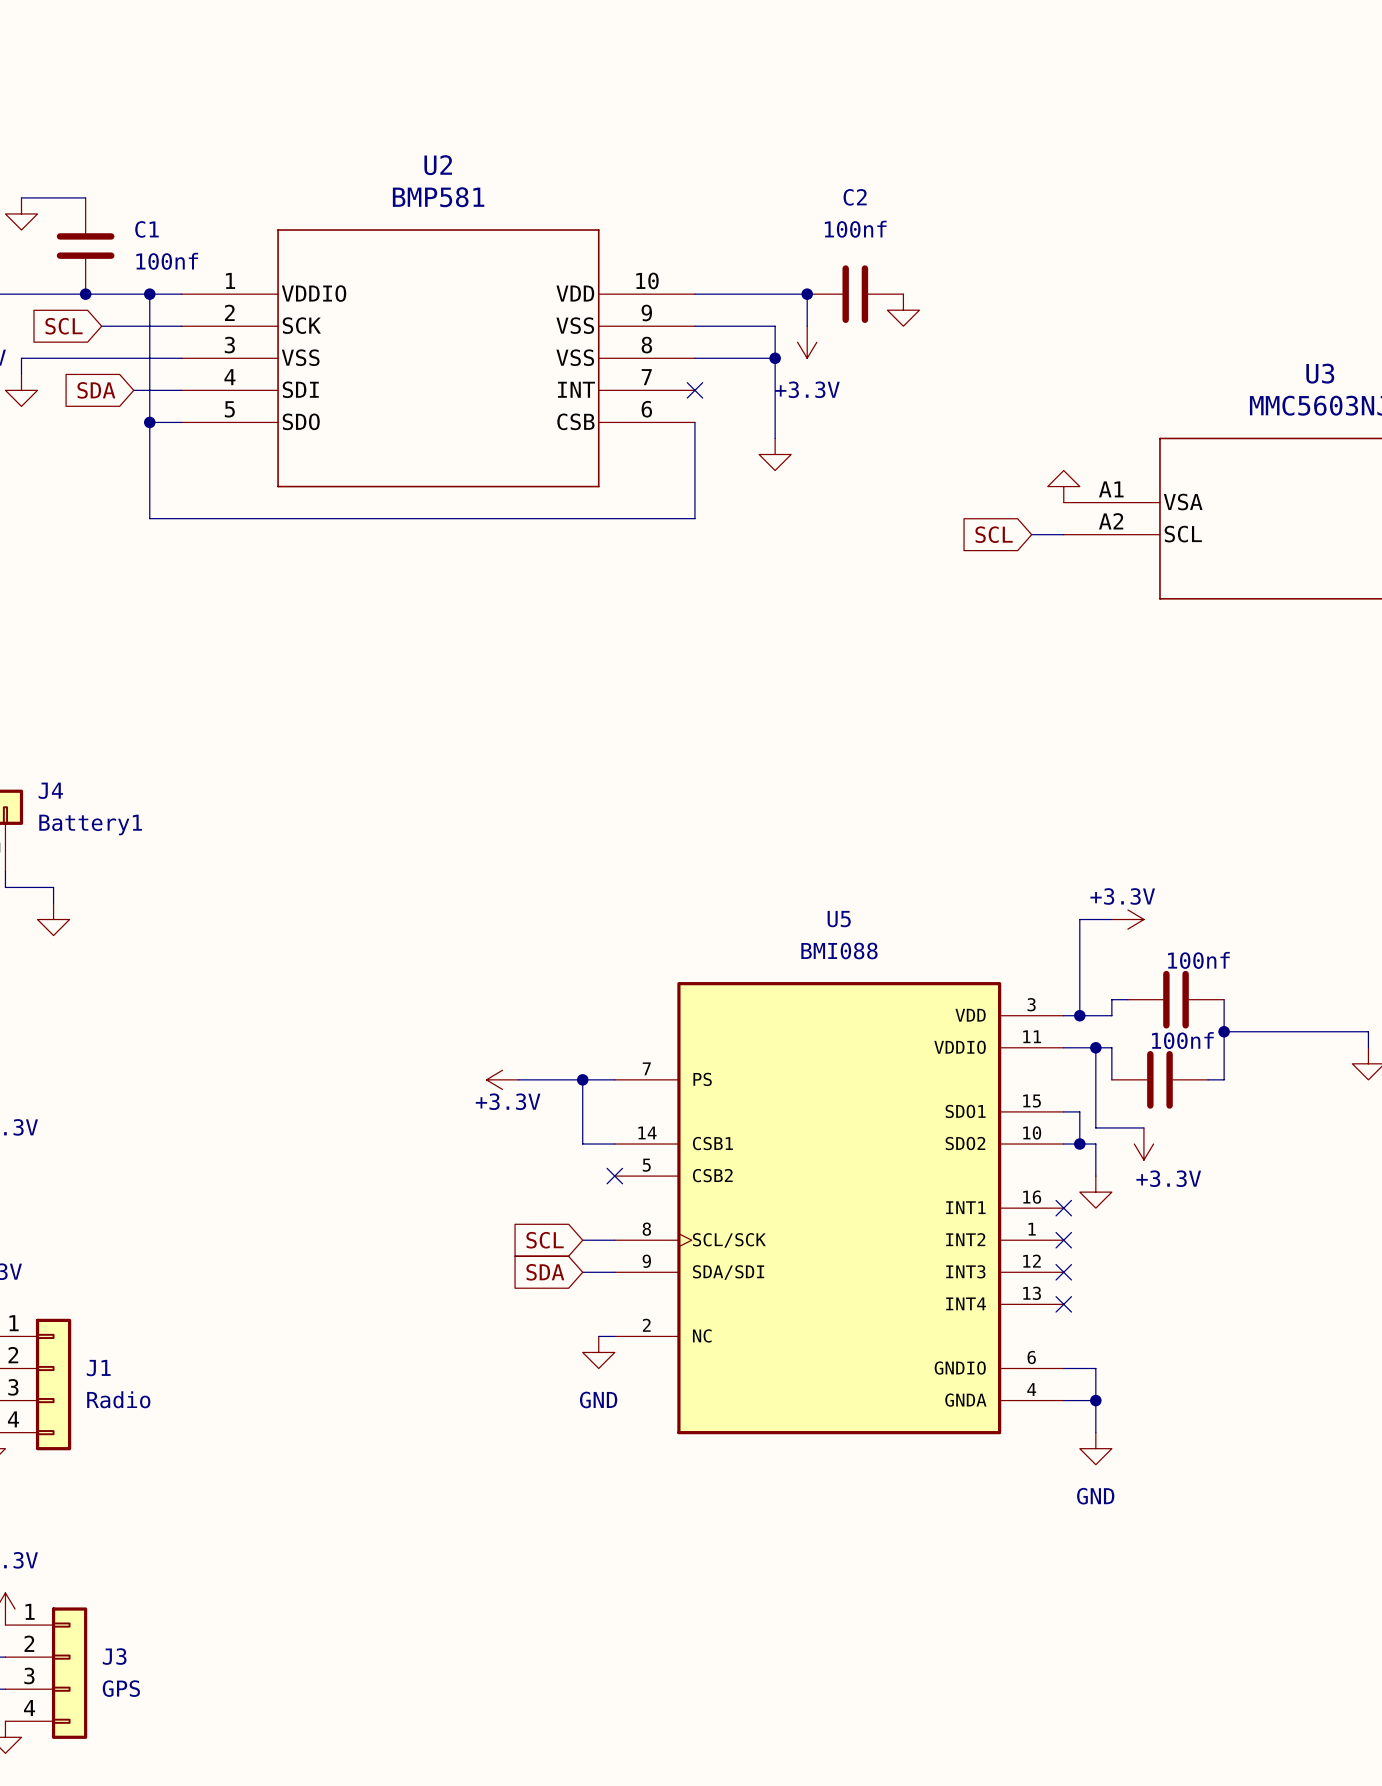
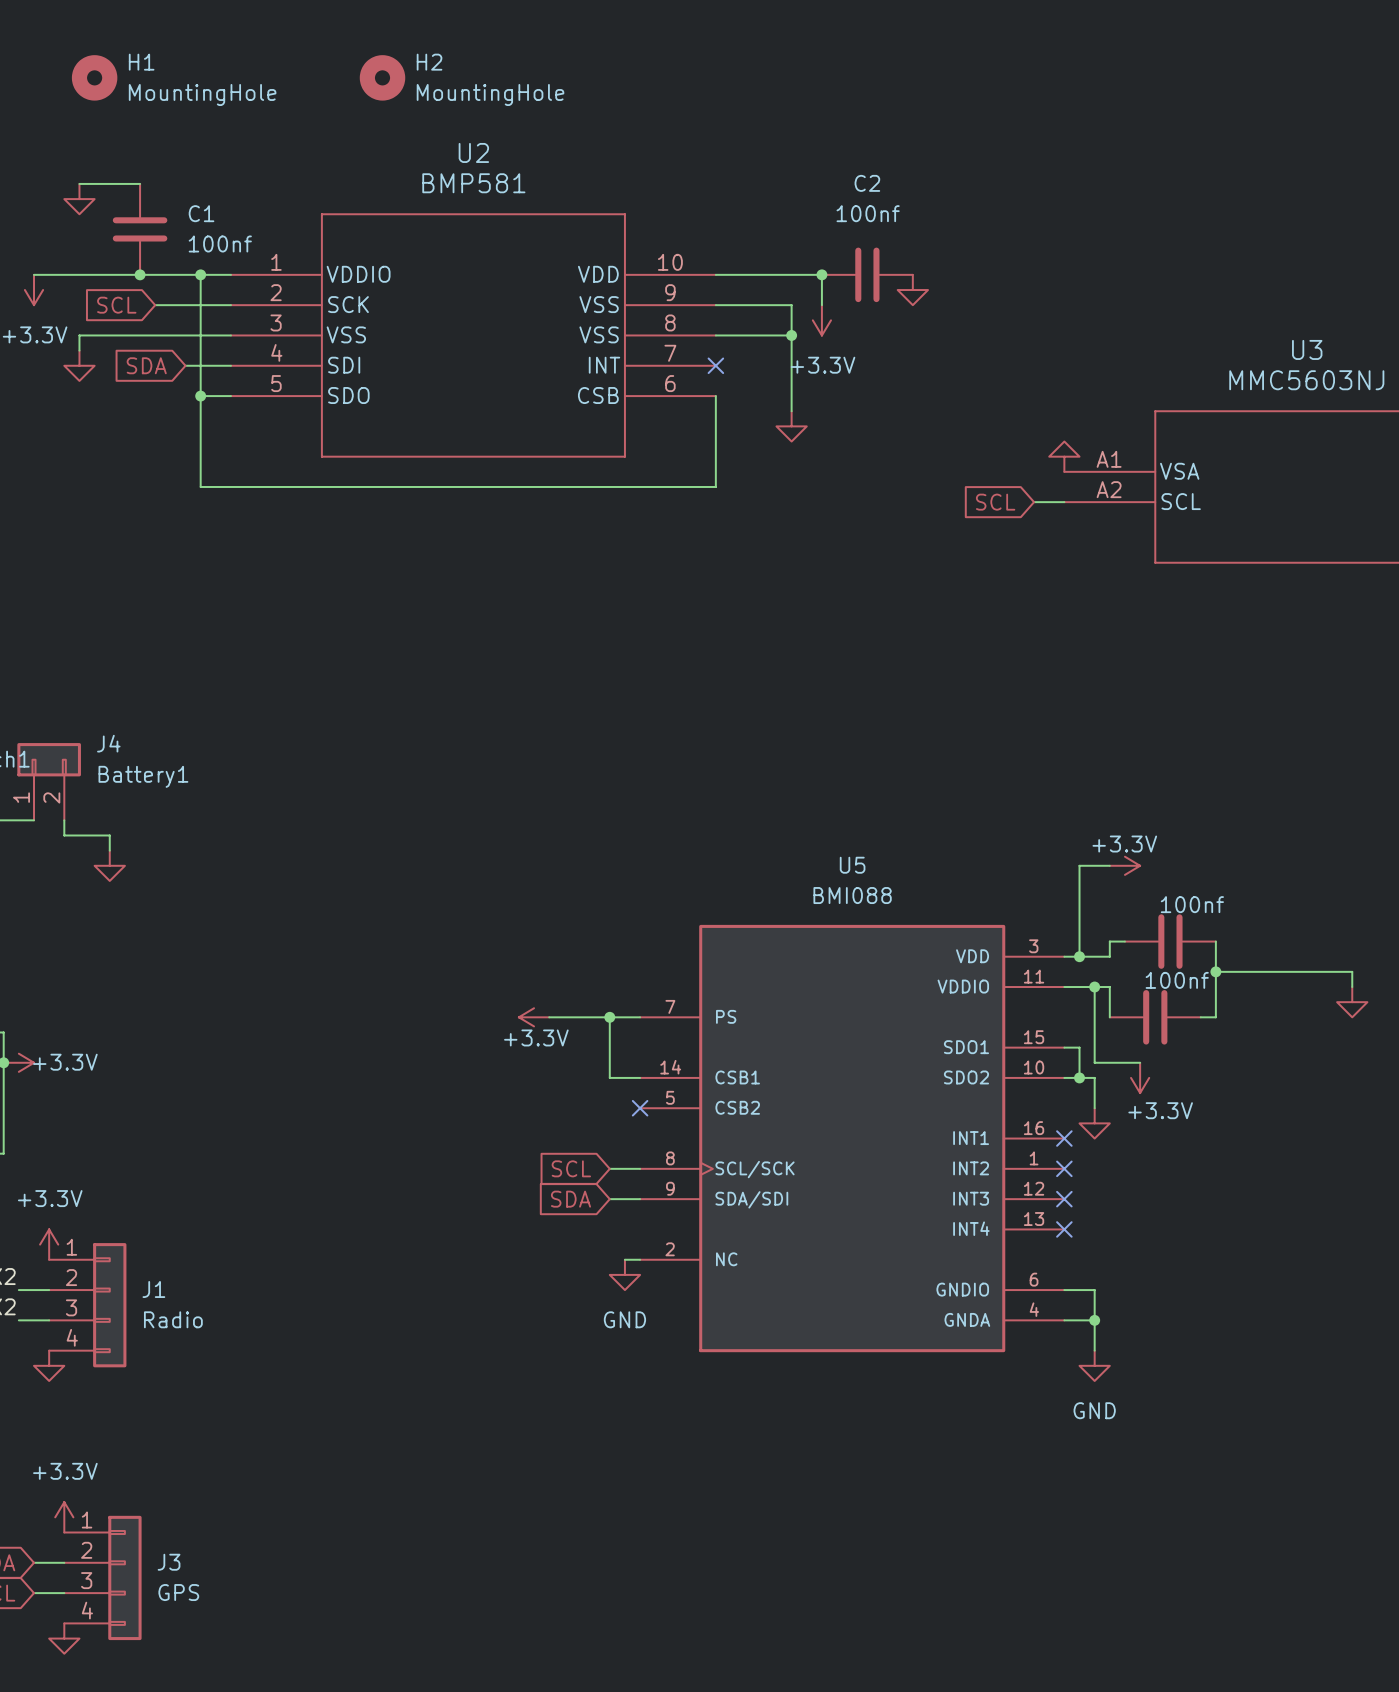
H1: none -> MountingHole (94, 77)
H2: none -> MountingHole (382, 77)

